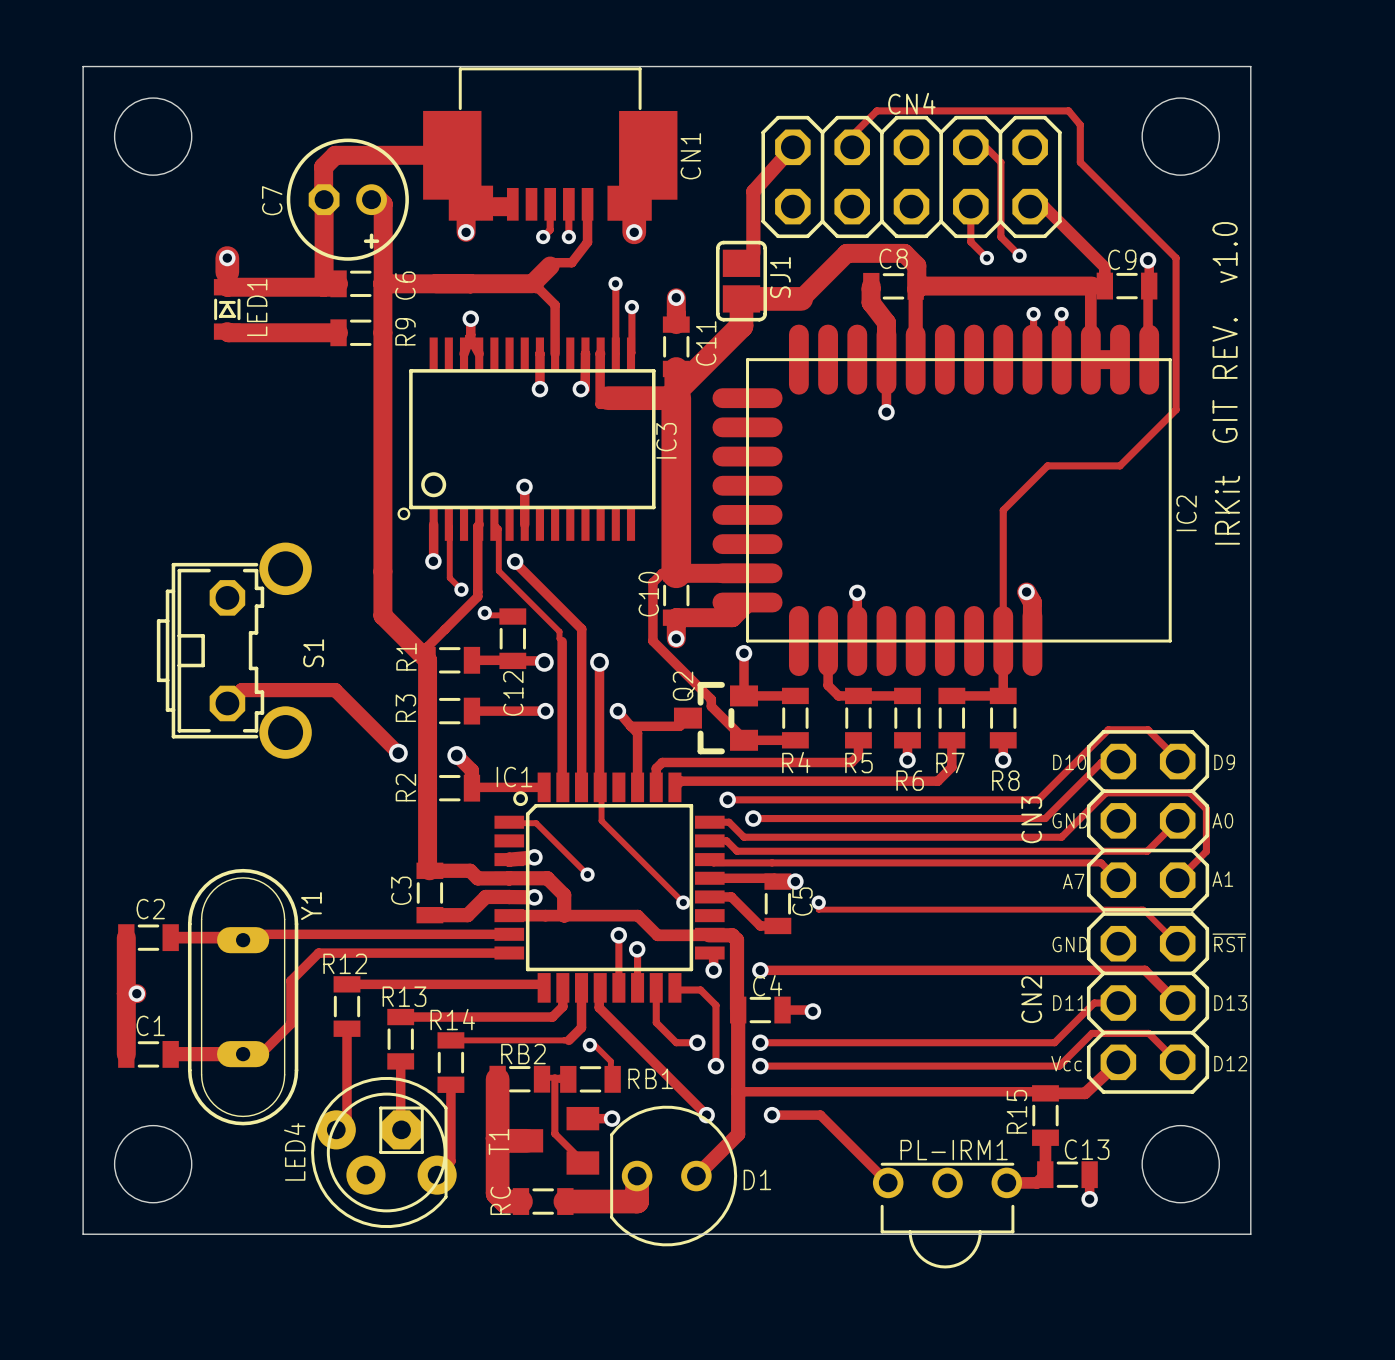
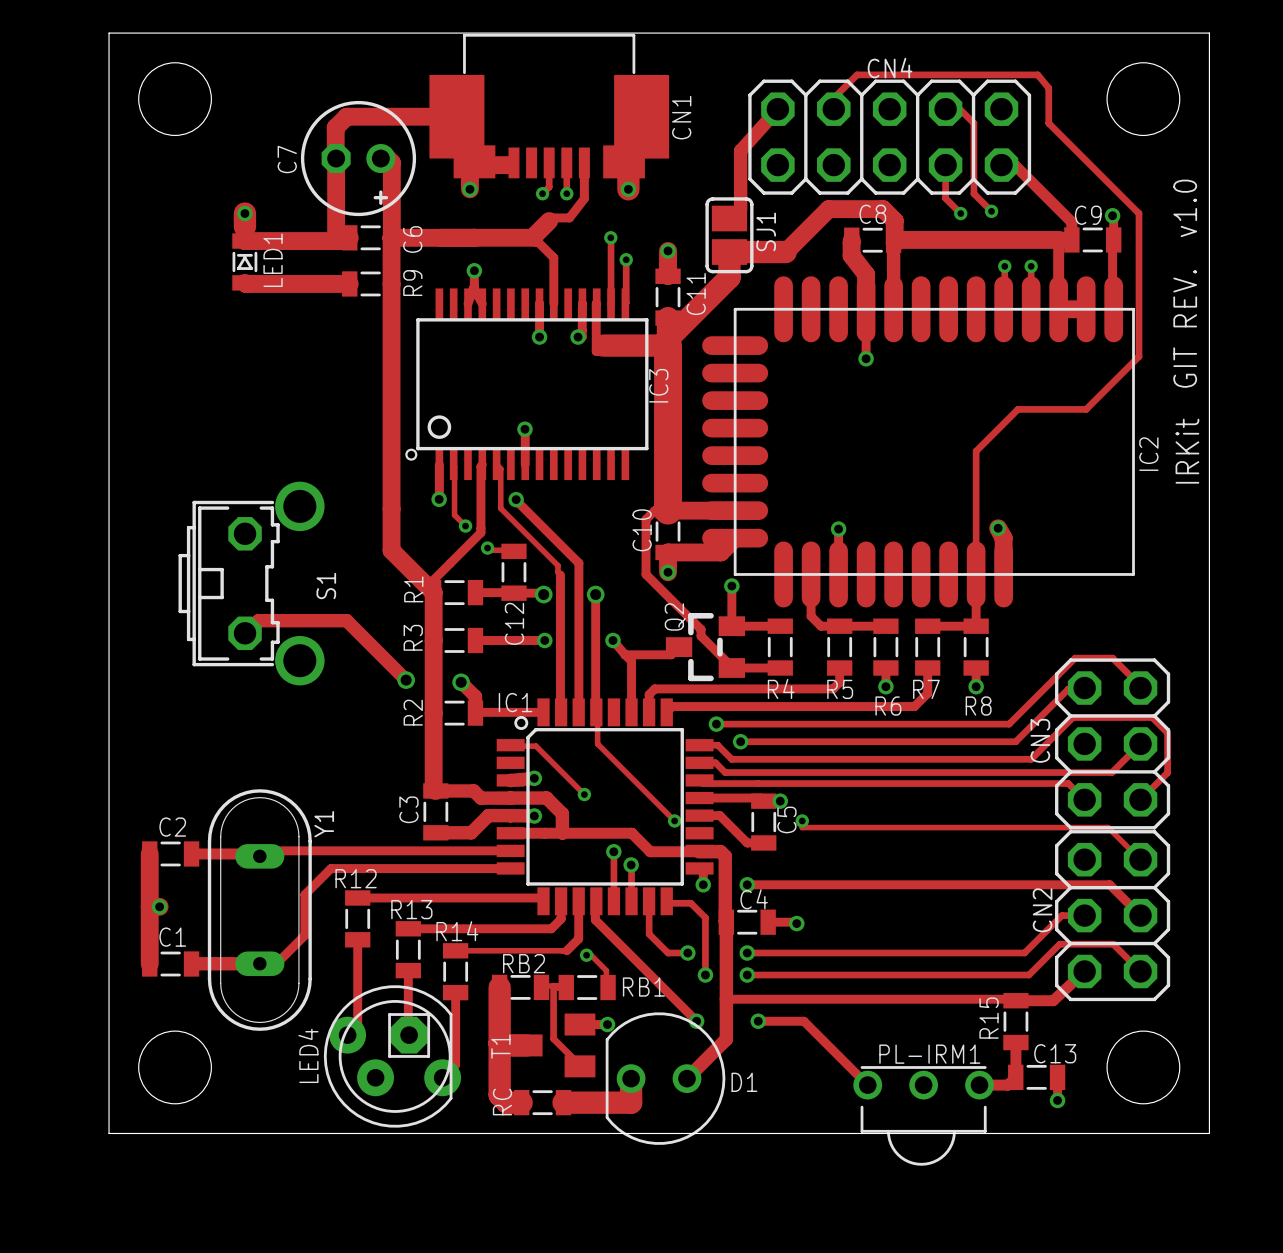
text: D10 (1069, 762) -> none
text: D9 (1224, 762) -> none
CN3 name position: CN3 (1031, 819) -> CN3 (1040, 740)
text: GND (1070, 820) -> none
text: A0 (1222, 820) -> none
text: A1 (1222, 879) -> none
text: A7 (1073, 881) -> none
text: ~{RST} (1229, 942) -> none
text: GND (1070, 944) -> none
CN2 name position: CN2 (1031, 999) -> CN2 (1042, 910)
text: D11 (1069, 1002) -> none
text: D13 (1230, 1002) -> none
text: Vcc (1066, 1063) -> none
text: D12 (1230, 1063) -> none

